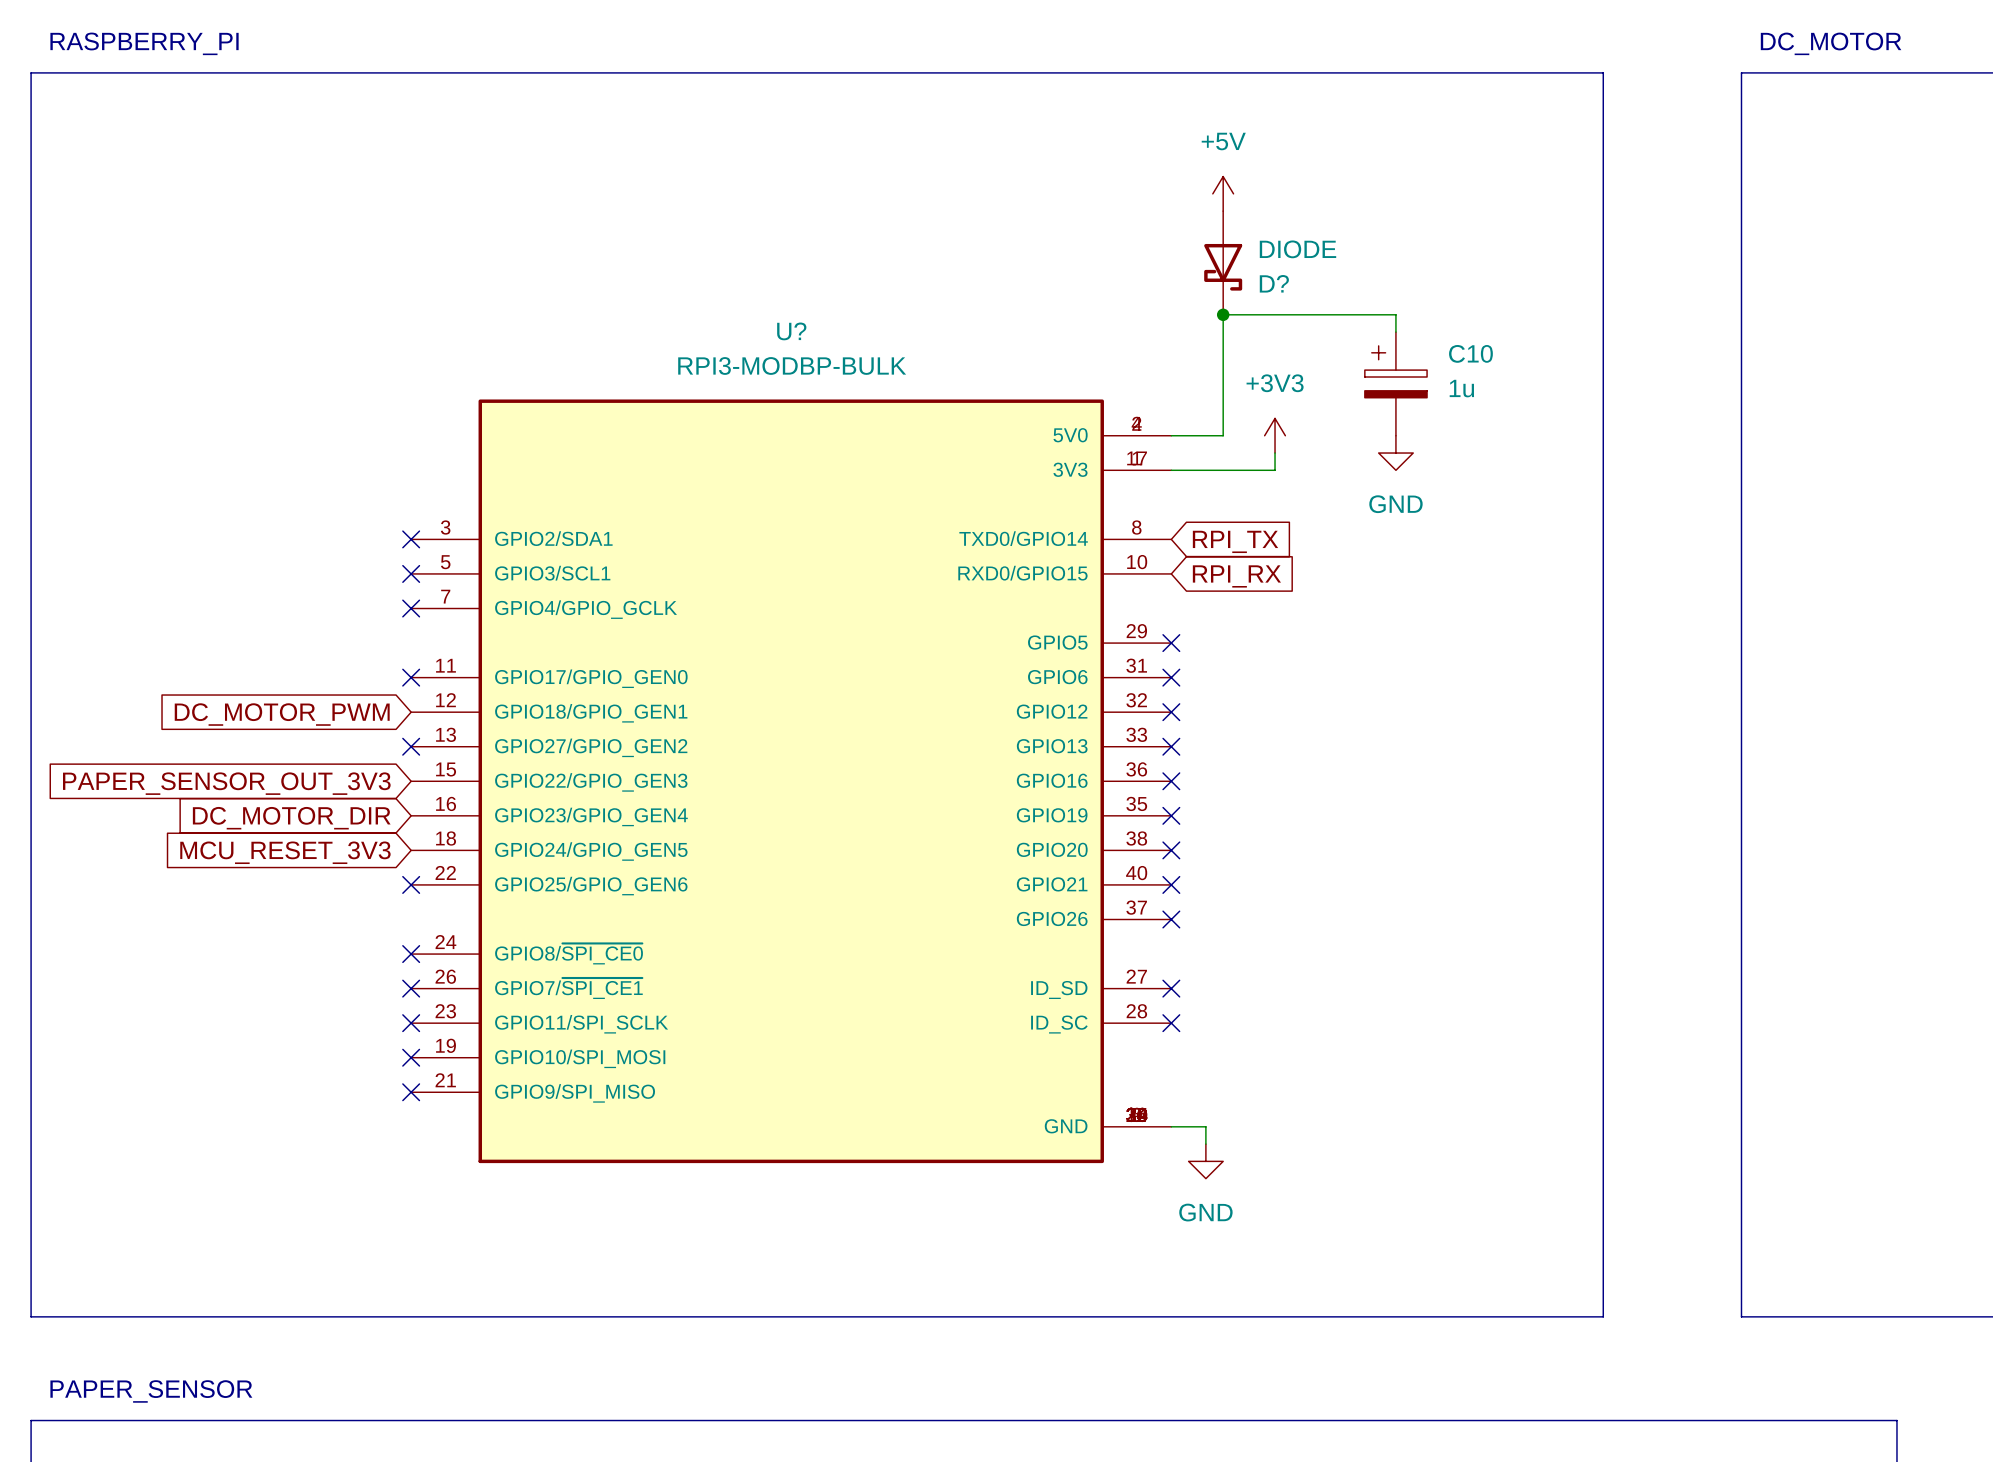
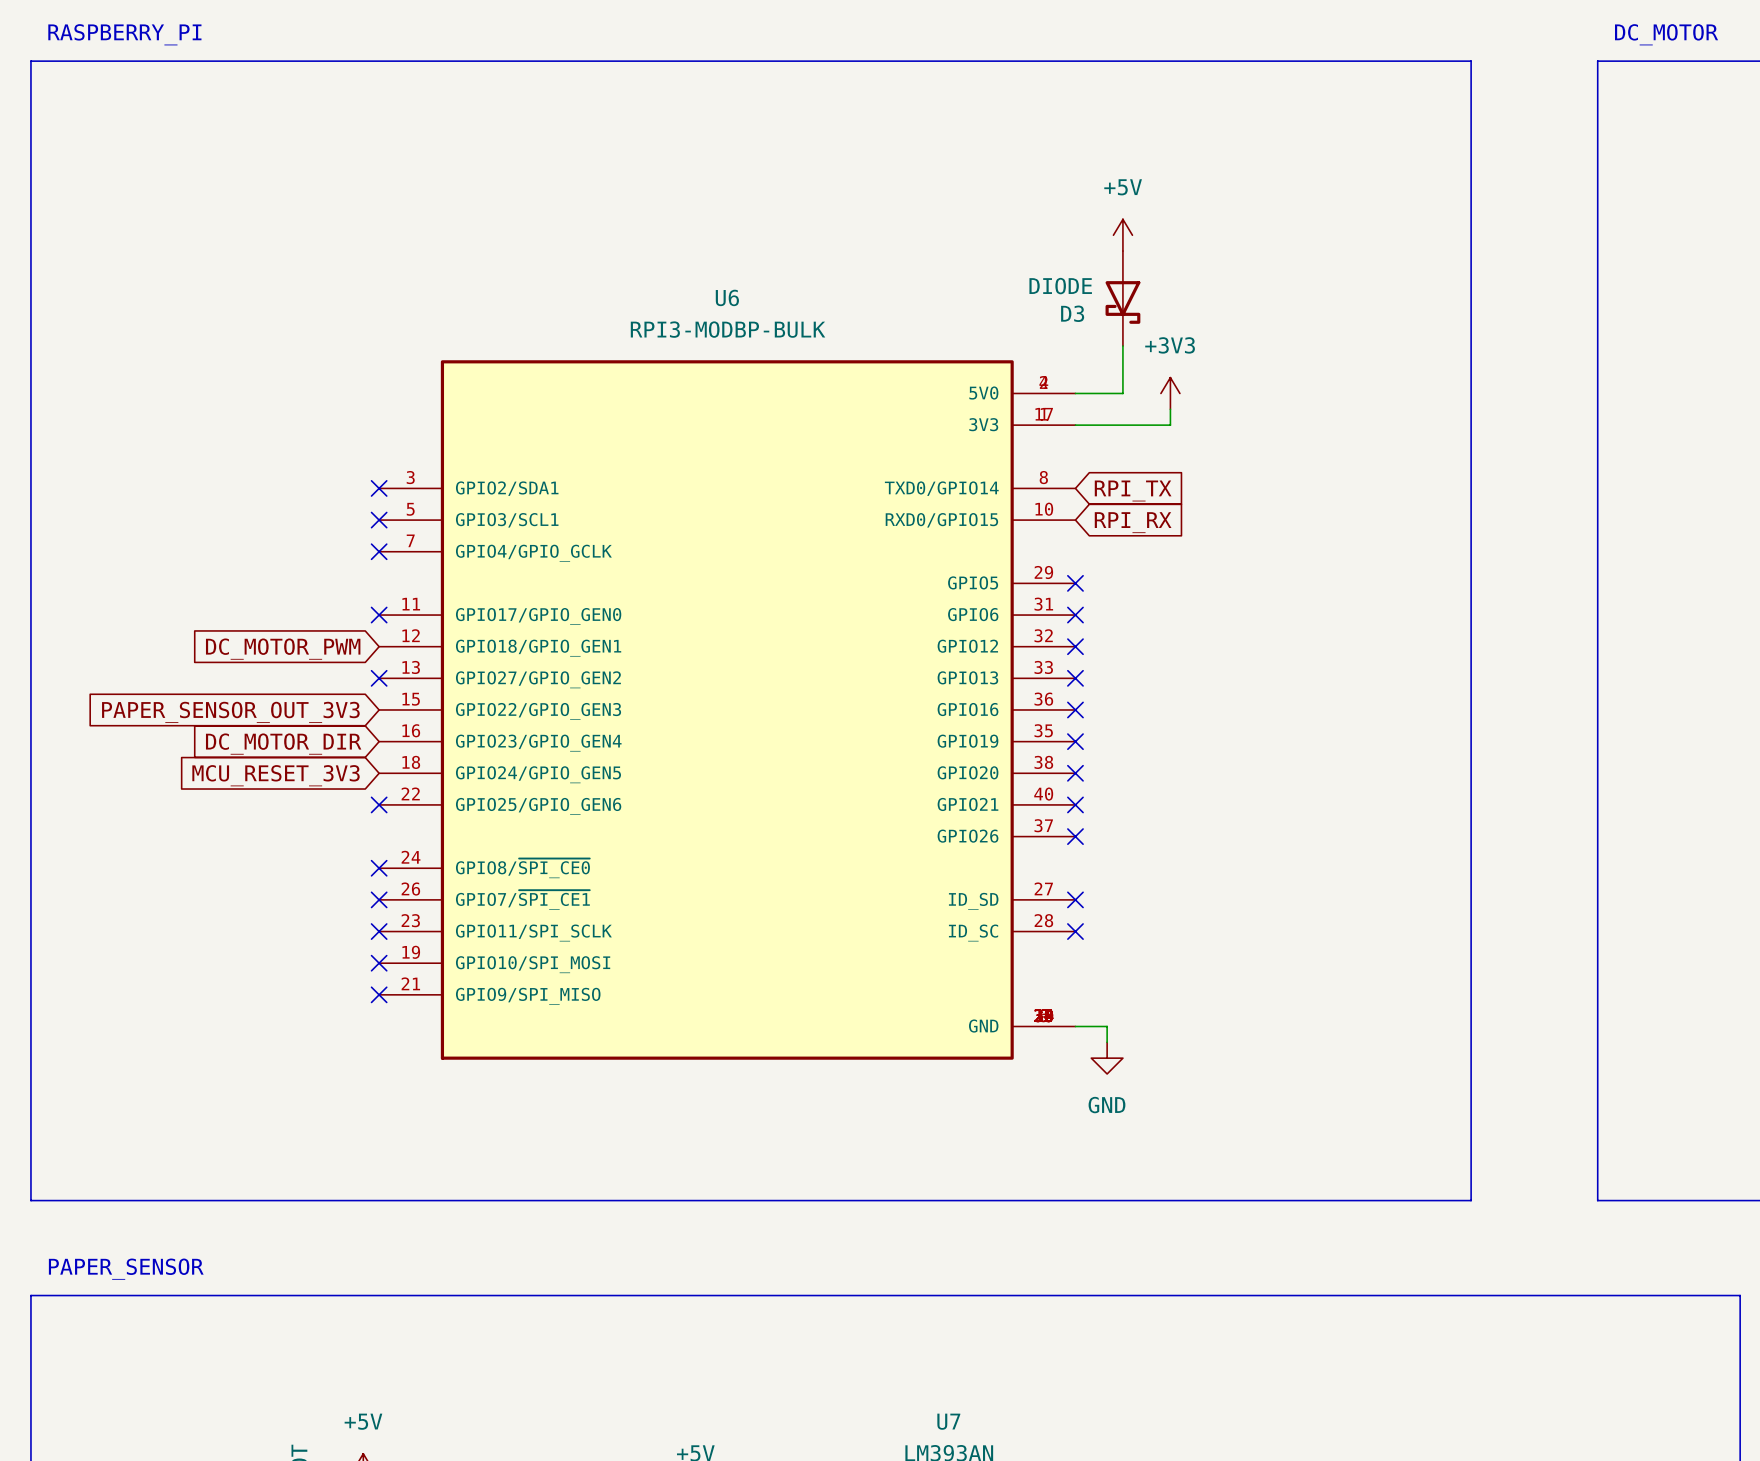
power symbol position: +5V (1223, 193) -> +5V (1122, 235)
D?: DIODE (1223, 262) -> none
junction: (1223, 314) -> none
U? name: U? (791, 331) -> U6 (727, 297)
D3: none -> DIODE (1122, 298)
wire: (1395, 332) (1395, 314) (1223, 314) (1223, 383) -> none
C10: 1u (1395, 383) -> none
power symbol: GND (1395, 453) -> none

